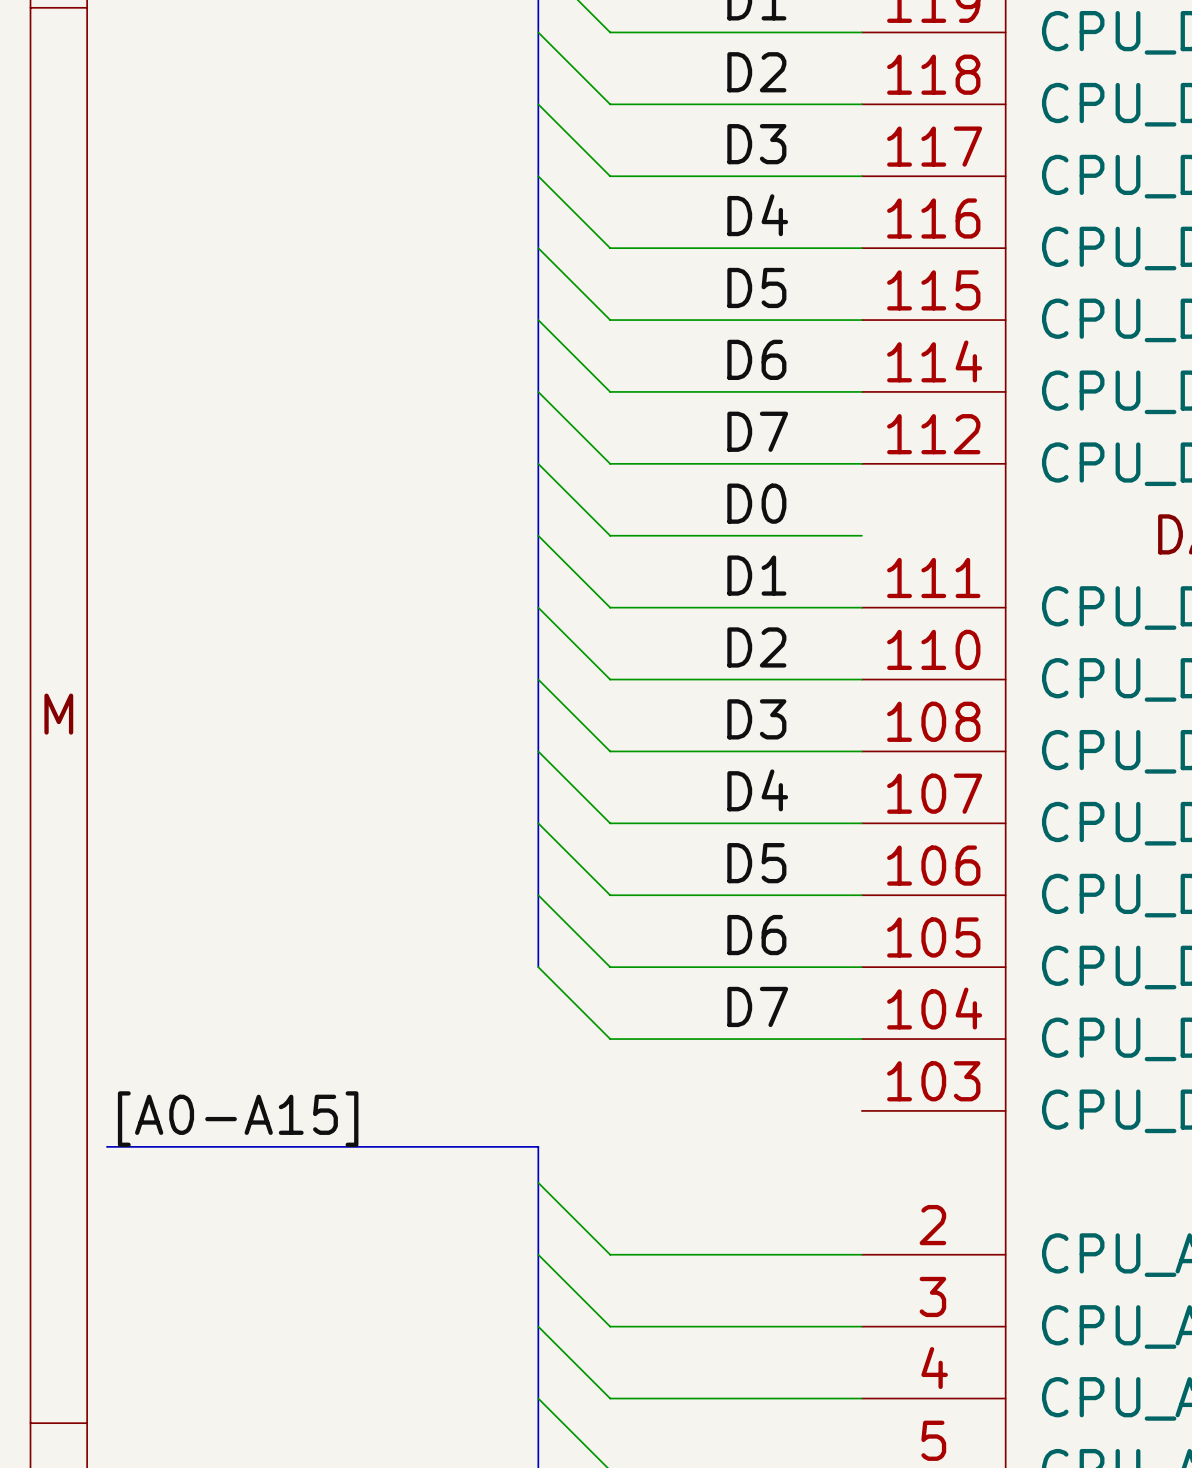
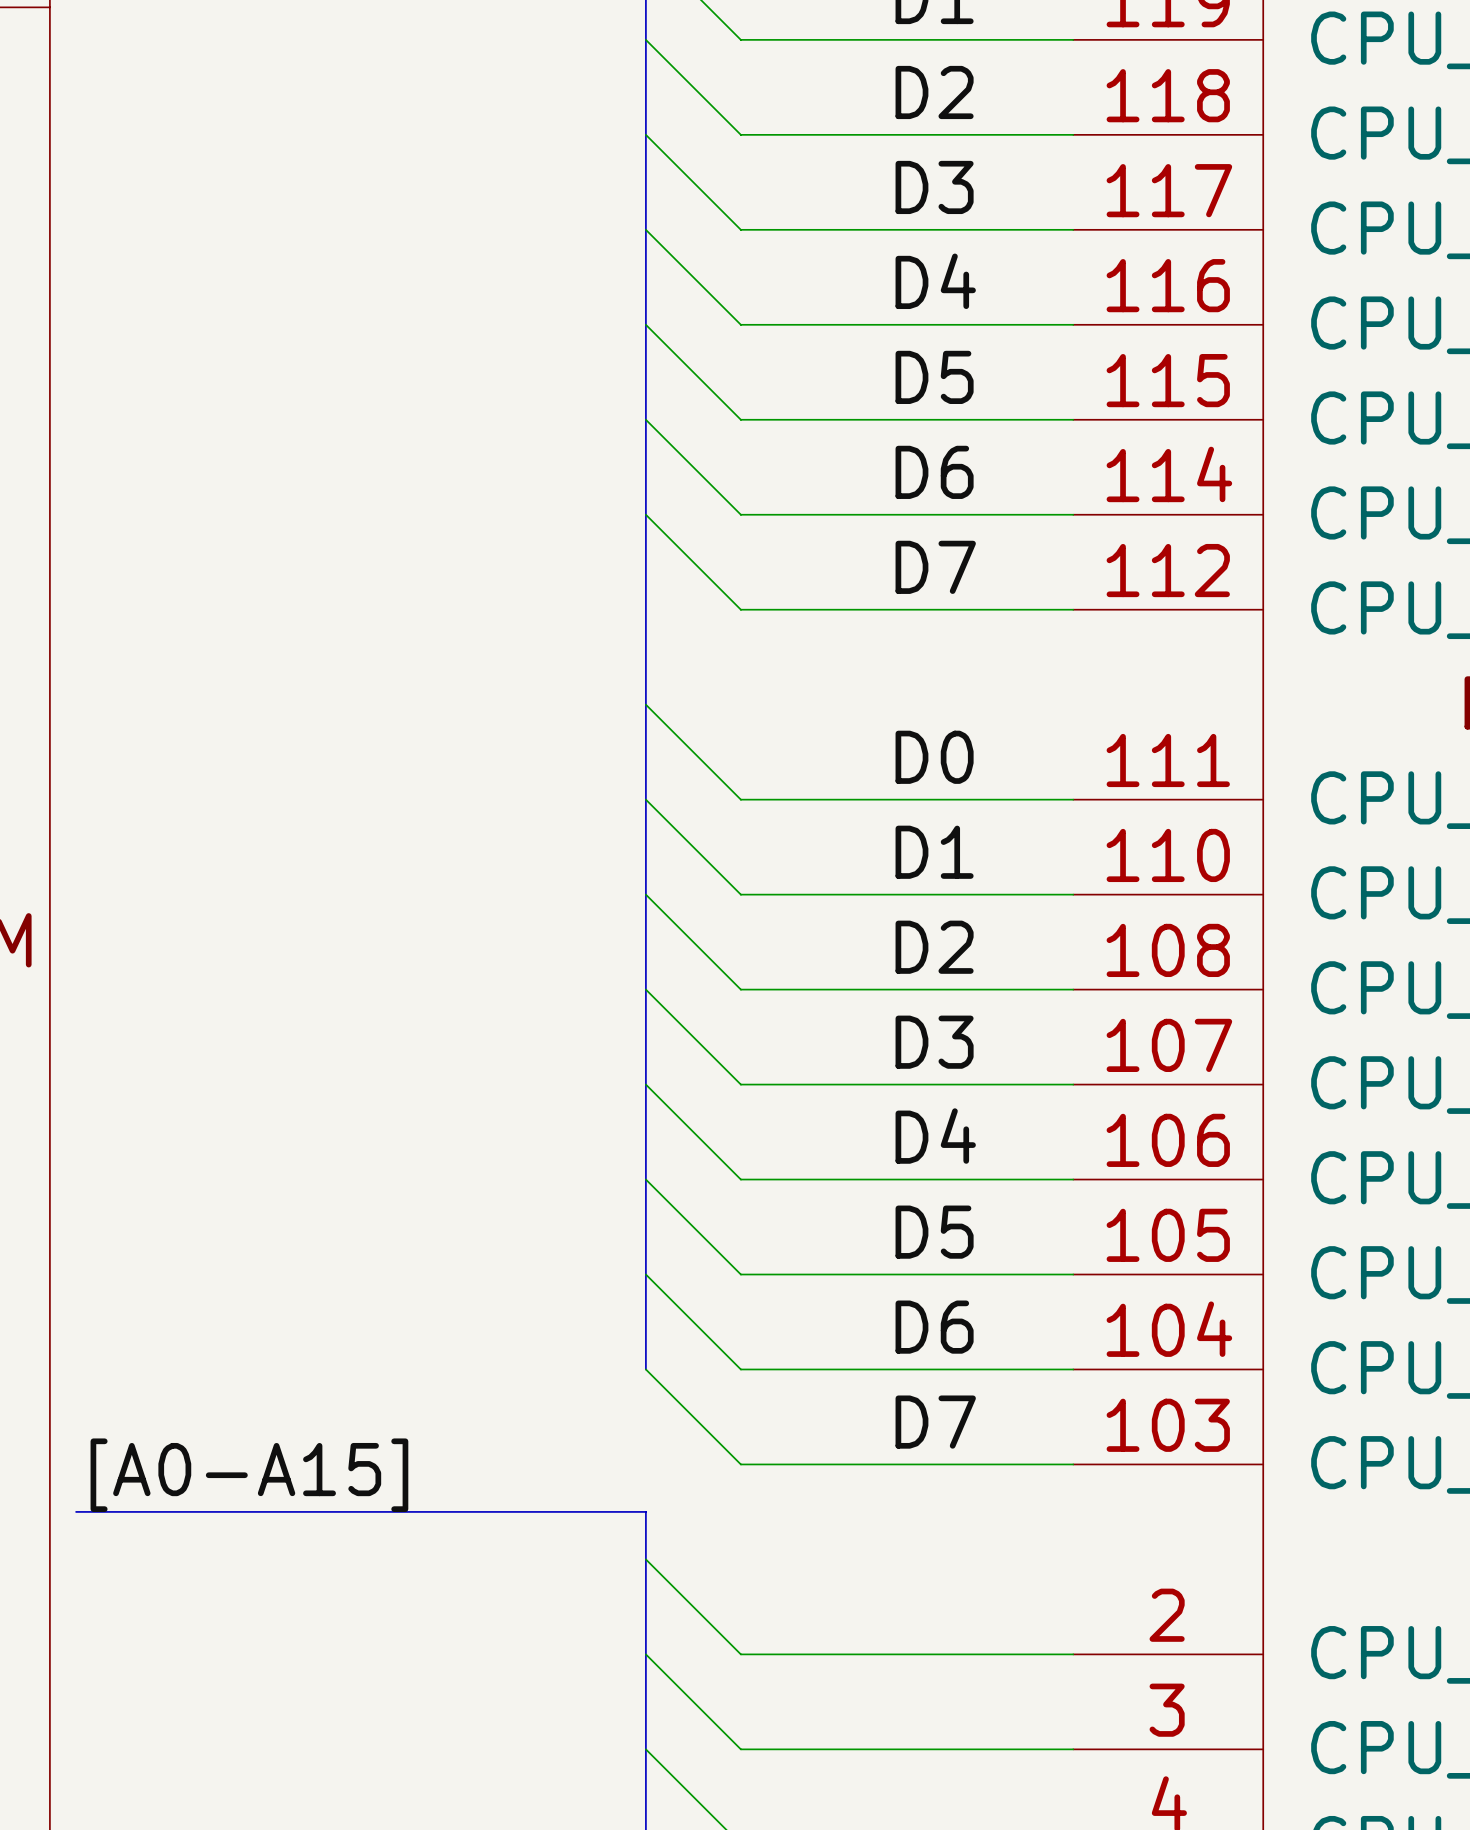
wire: (538, 463) (610, 535) (861, 535) -> (645, 1369) (740, 1464) (1073, 1464)
label: D0 (756, 503) -> none
label: D1 (756, 575) -> D0 (934, 757)
label: D2 (756, 647) -> D1 (934, 852)
label: D3 (756, 719) -> D2 (934, 947)
label: D4 (757, 790) -> D3 (934, 1042)
label: D5 (756, 863) -> D4 (935, 1136)
label: D6 (756, 935) -> D5 (934, 1232)
bus: none -> (645, 1274) (645, 1369)
label: D7 (757, 1006) -> D6 (934, 1327)
label: none -> D7 (935, 1422)

